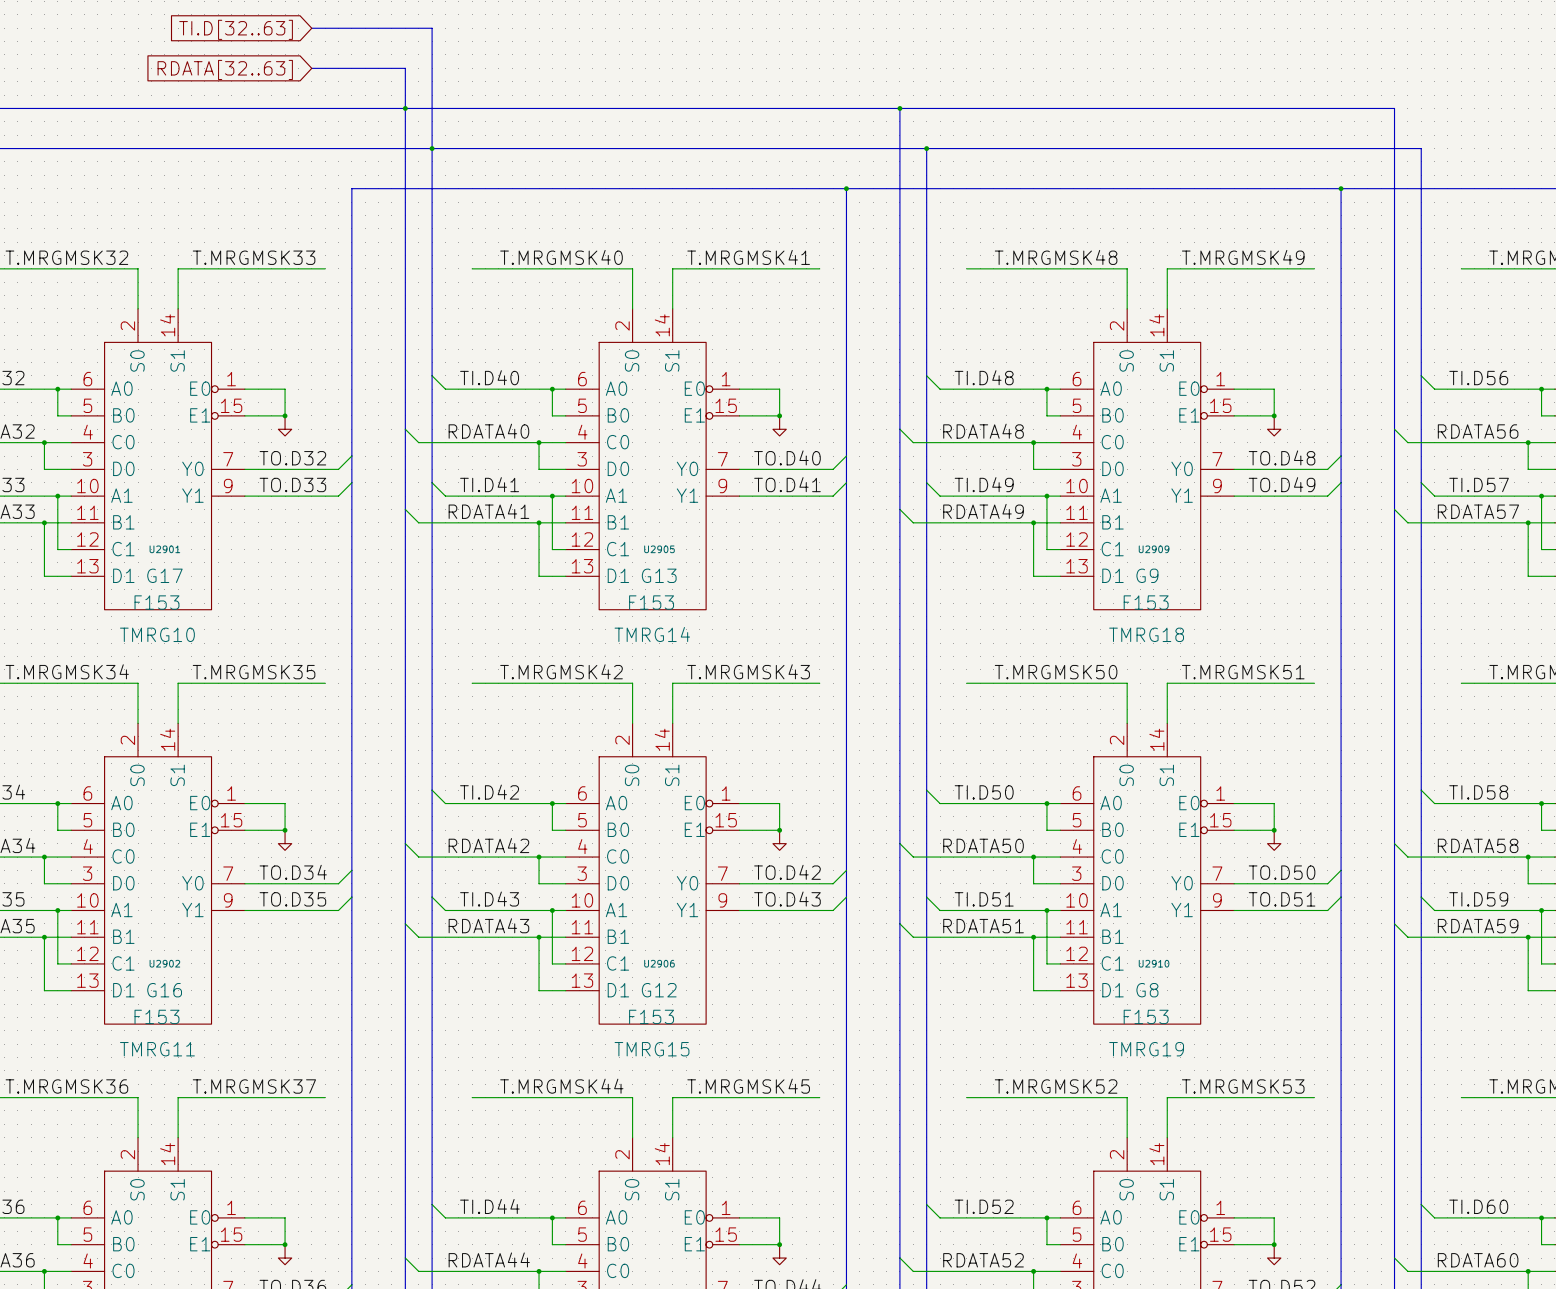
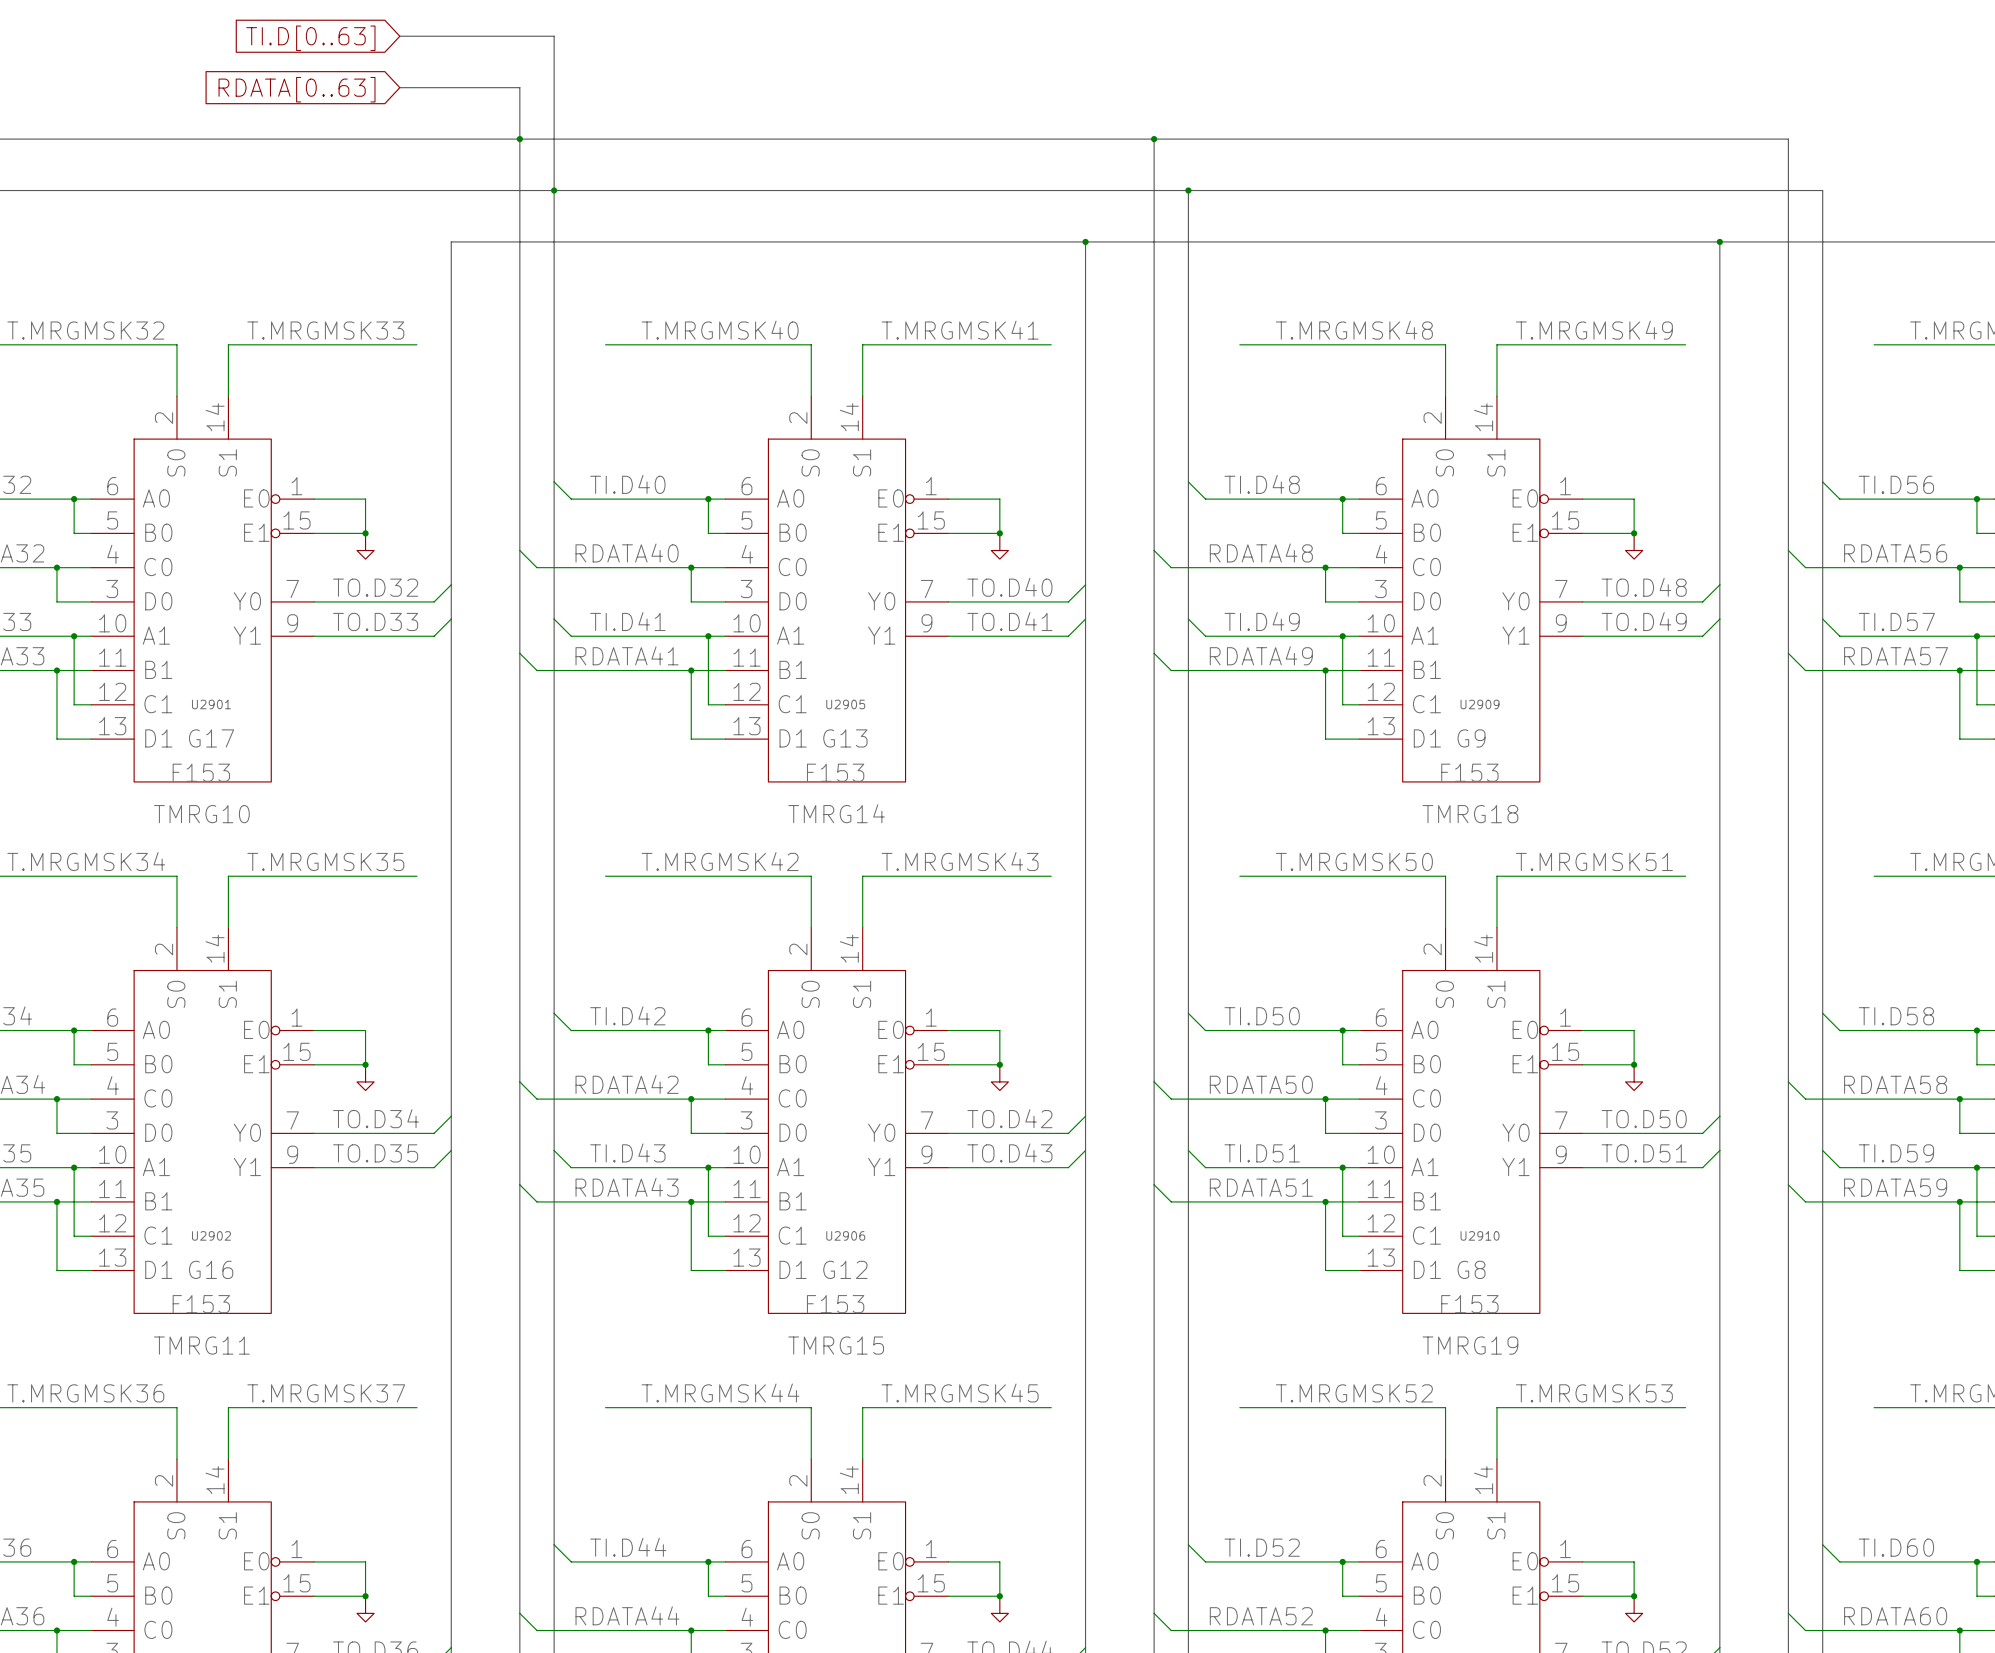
global label: TI.D[32..63] (236, 29) -> TI.D[0..63] (310, 38)
global label: RDATA[32..63] (225, 69) -> RDATA[0..63] (297, 89)

